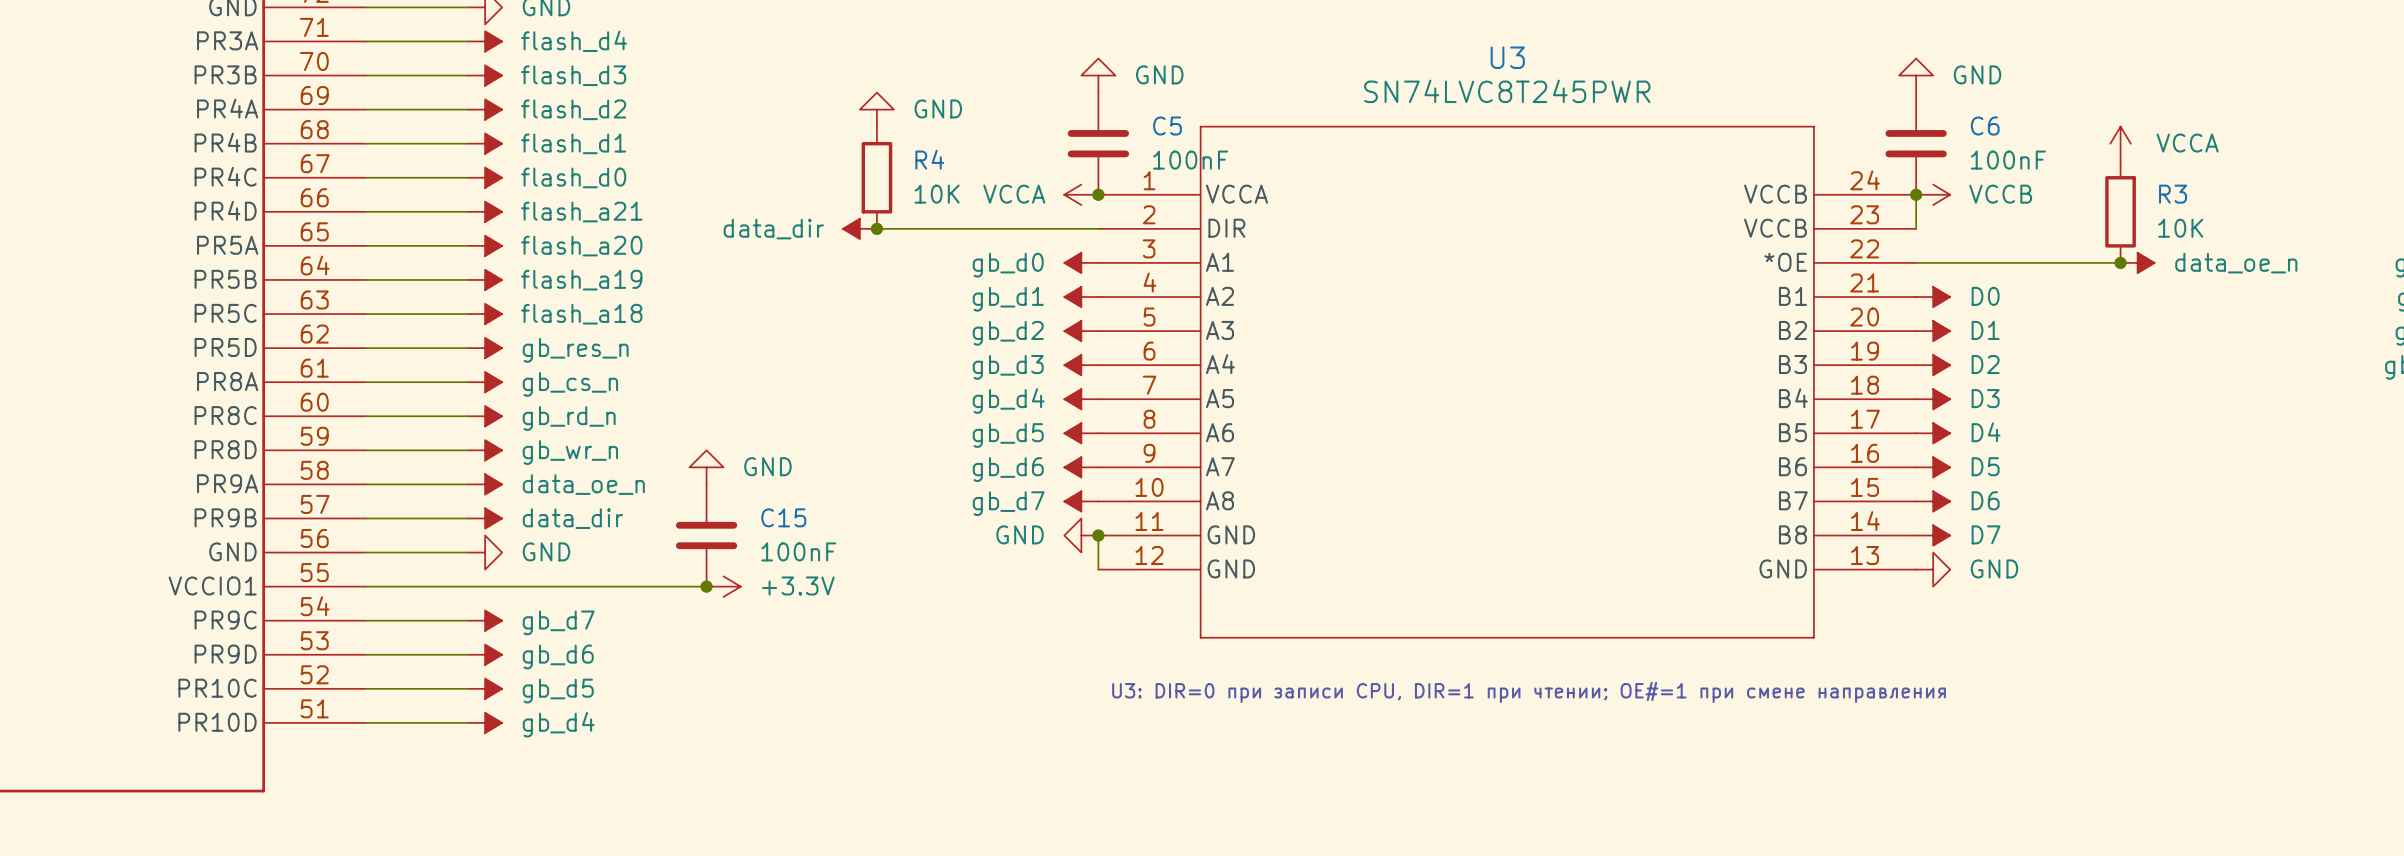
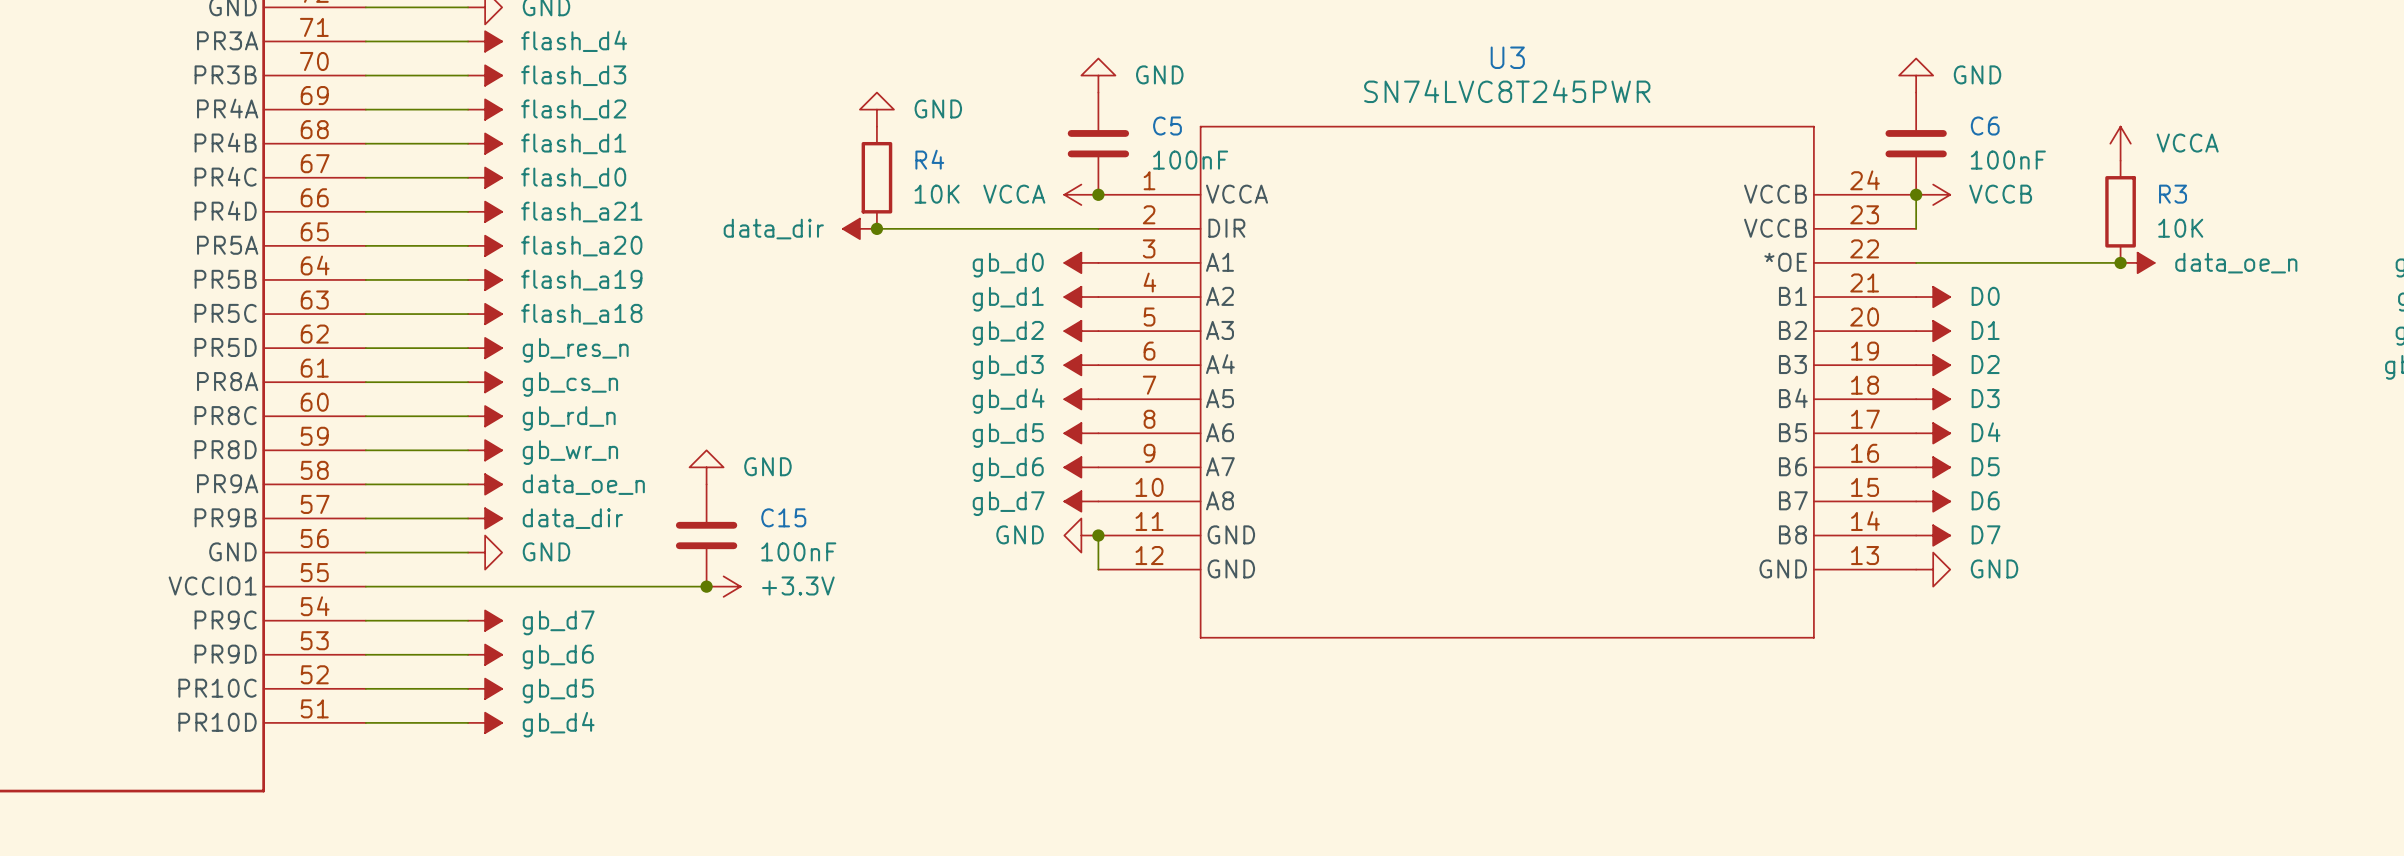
text: U3: DIR=0 при записи CPU, DIR=1 при чтении; OE#=1 при смене направления (1529, 692) -> none

